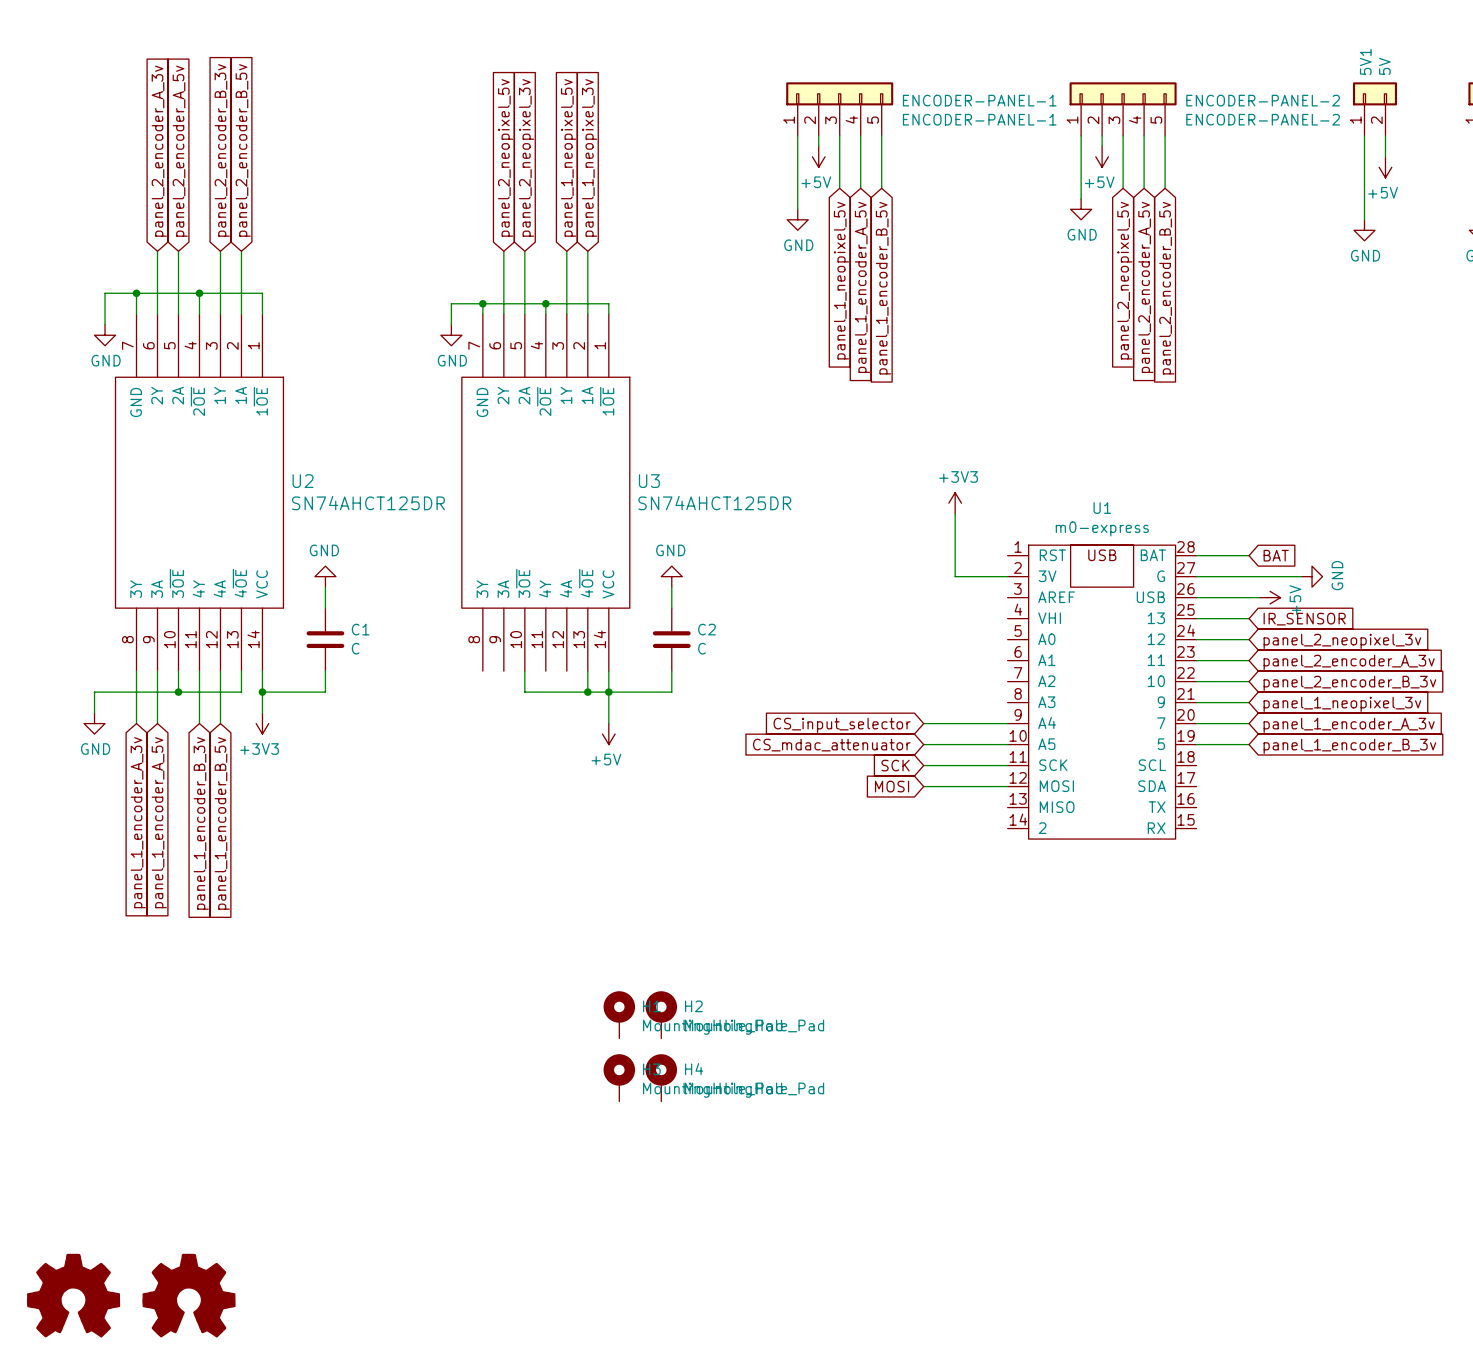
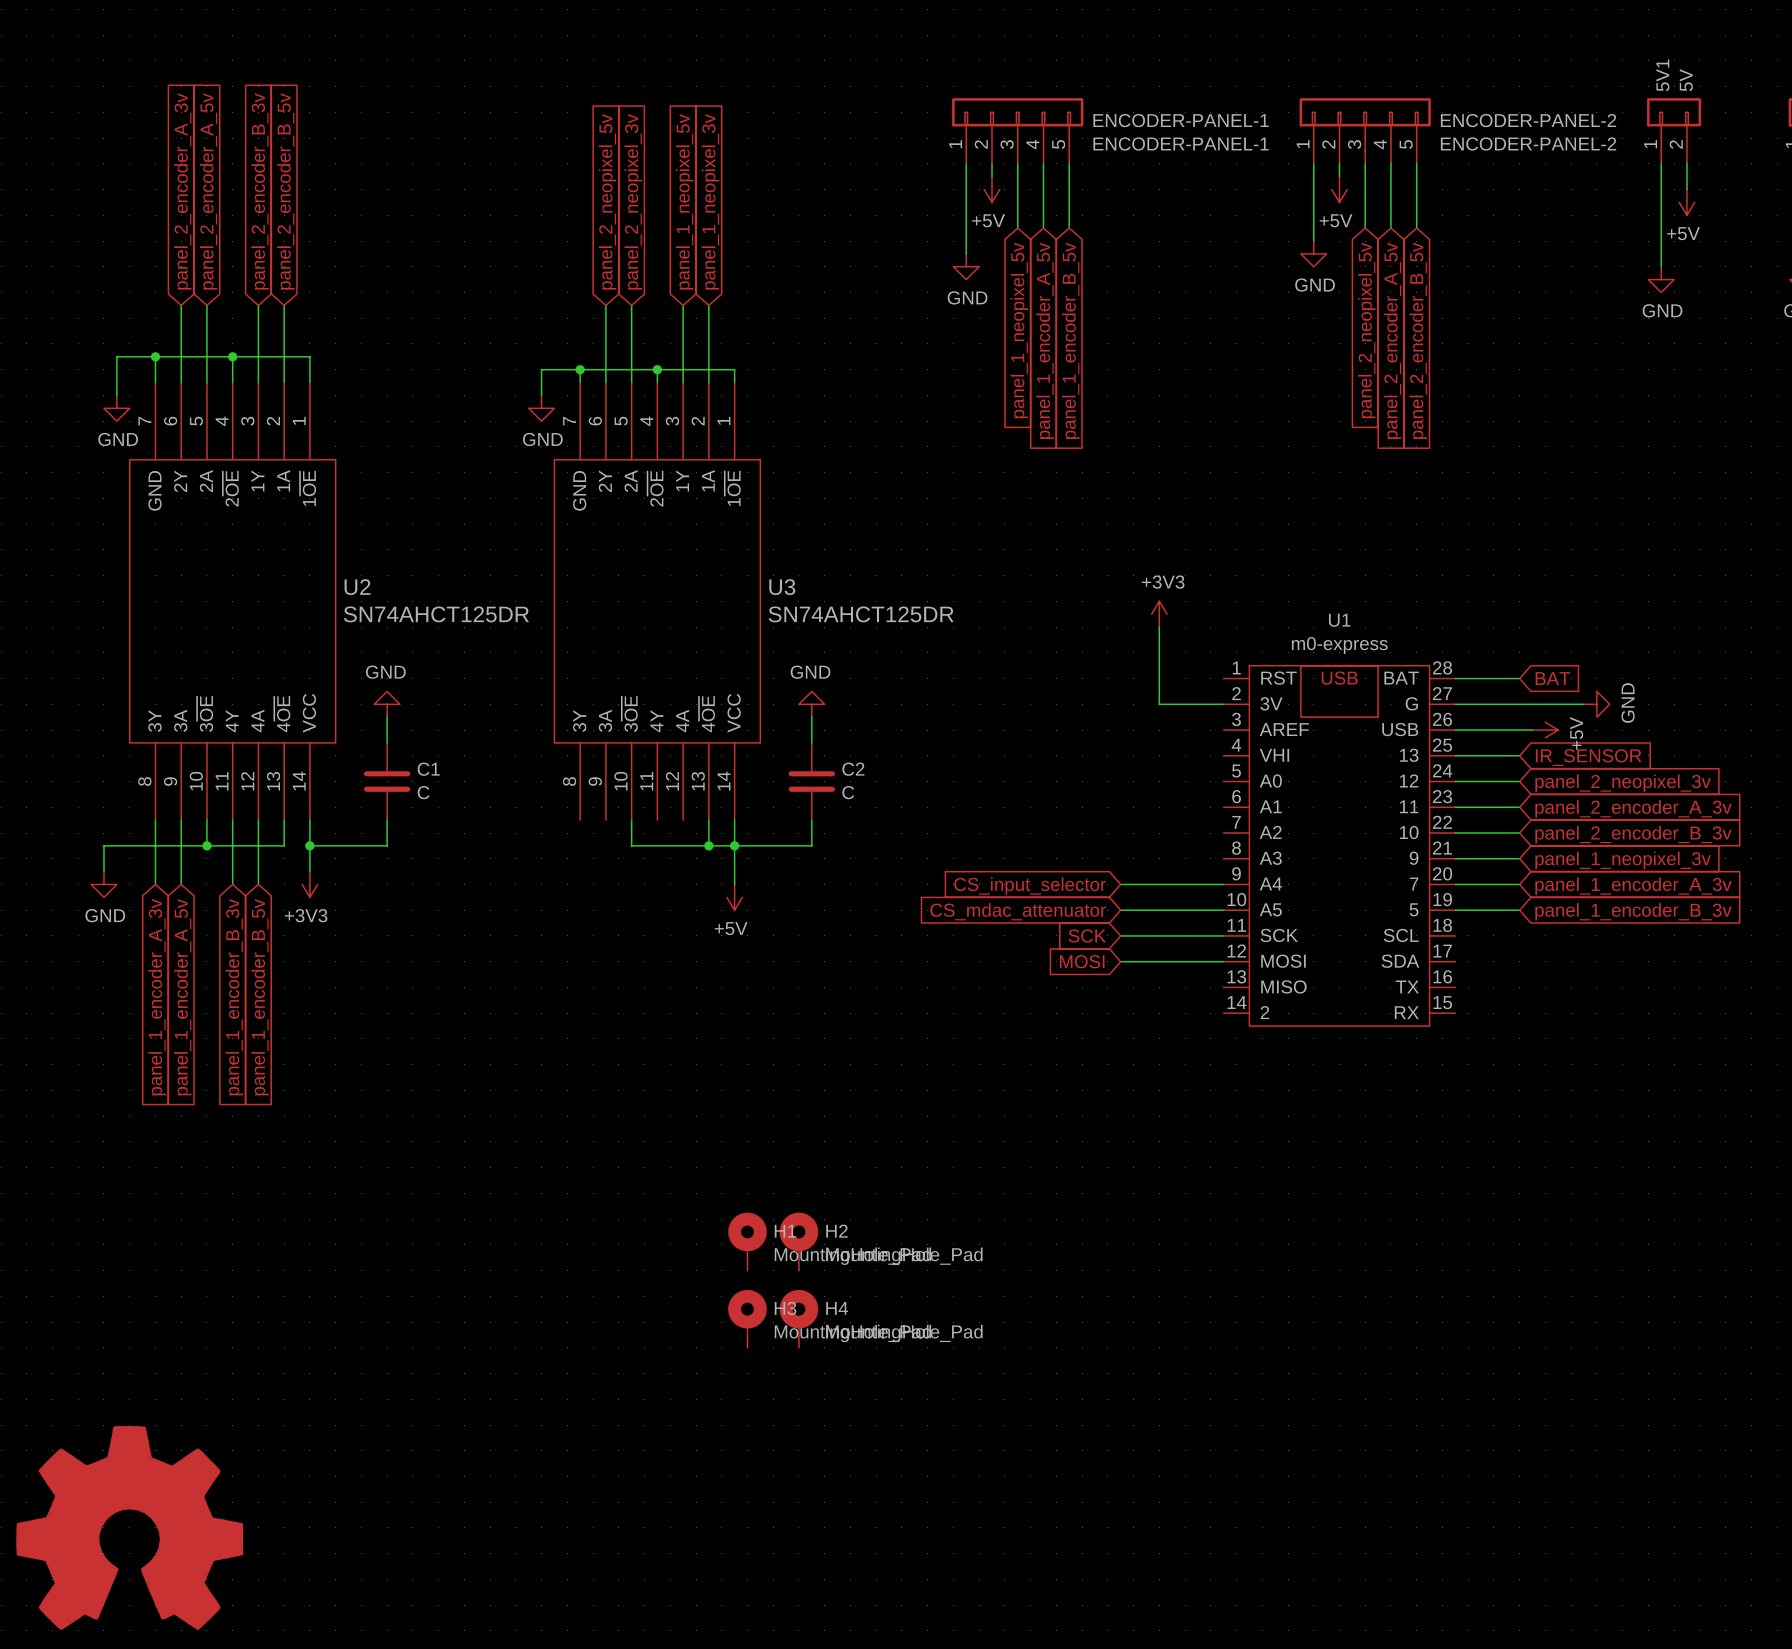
power symbol: none -> (129, 1527)
part: (73, 1295) -> none
part: (188, 1295) -> none

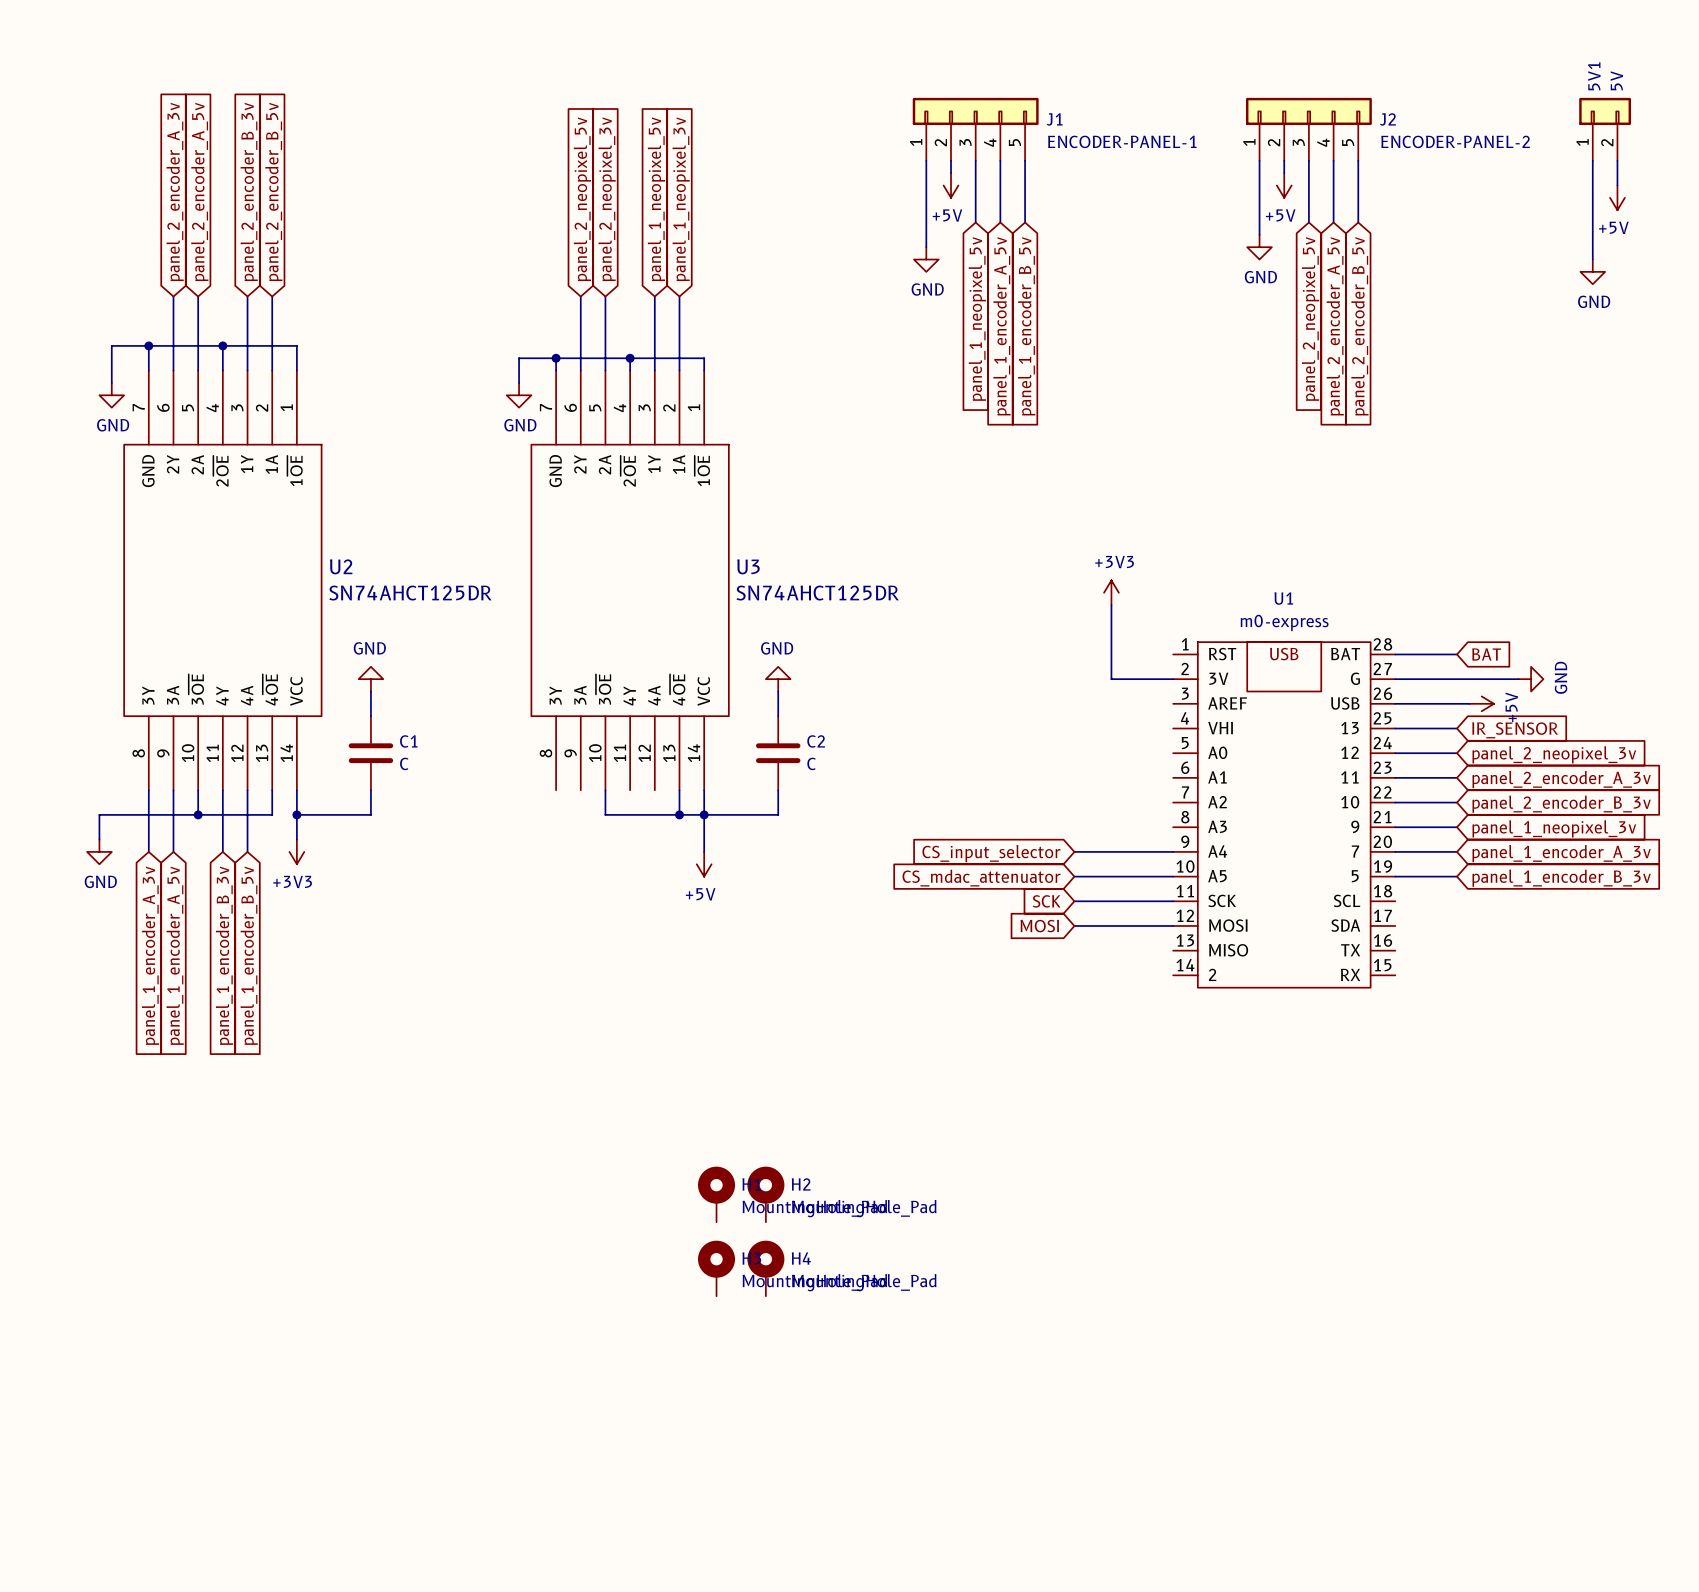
ENCODER-PANEL-1 name: ENCODER-PANEL-1 (1181, 120) -> J1 (1054, 119)
ENCODER-PANEL-2 name: ENCODER-PANEL-2 (1528, 120) -> J2 (1387, 119)
power symbol: (129, 1527) -> none

